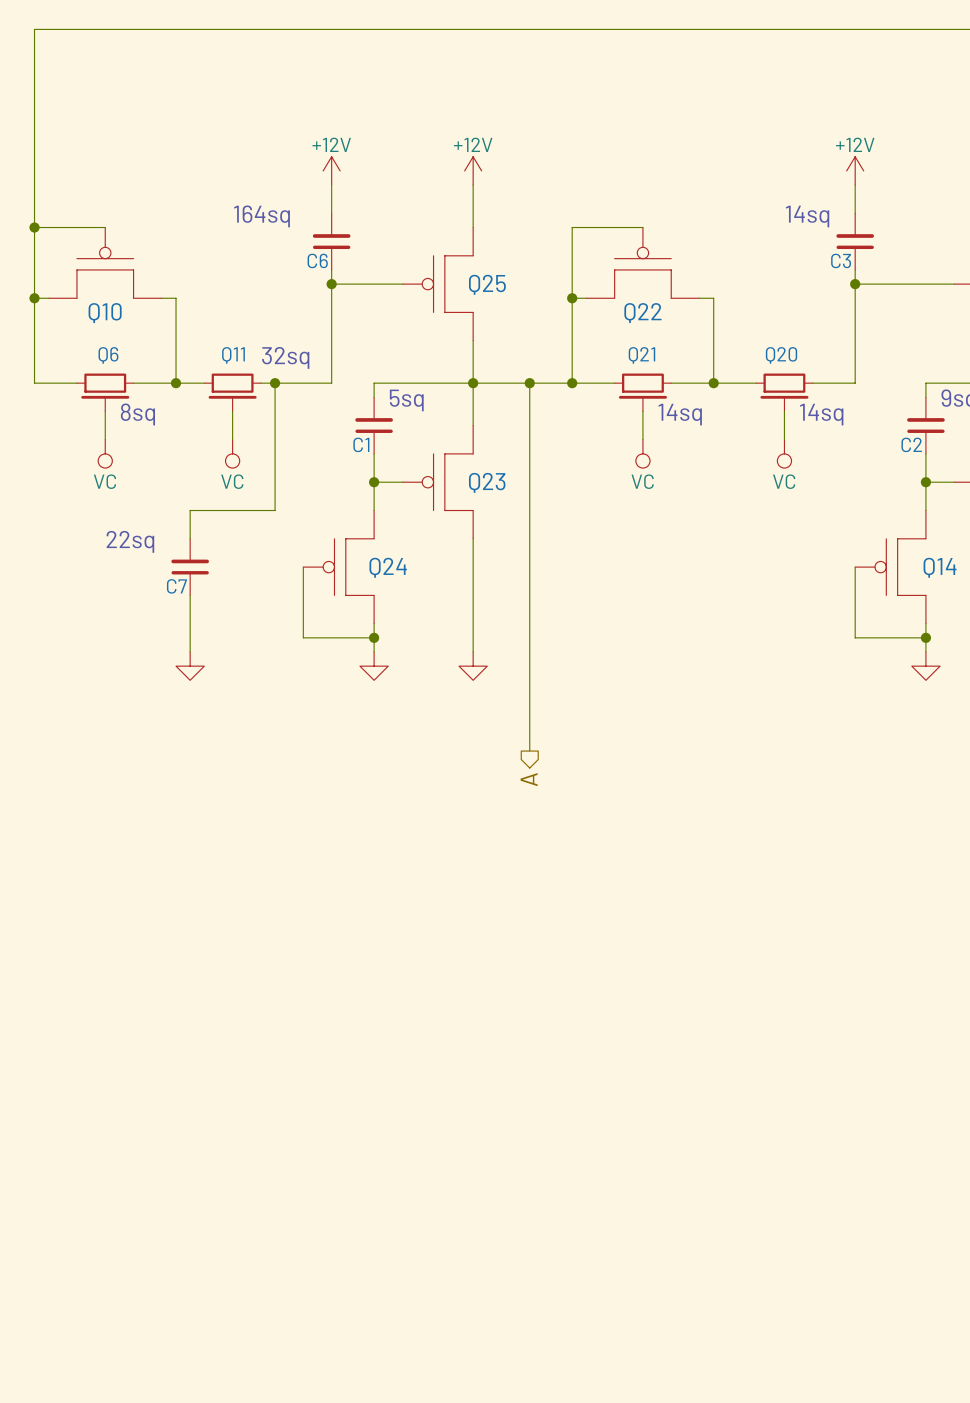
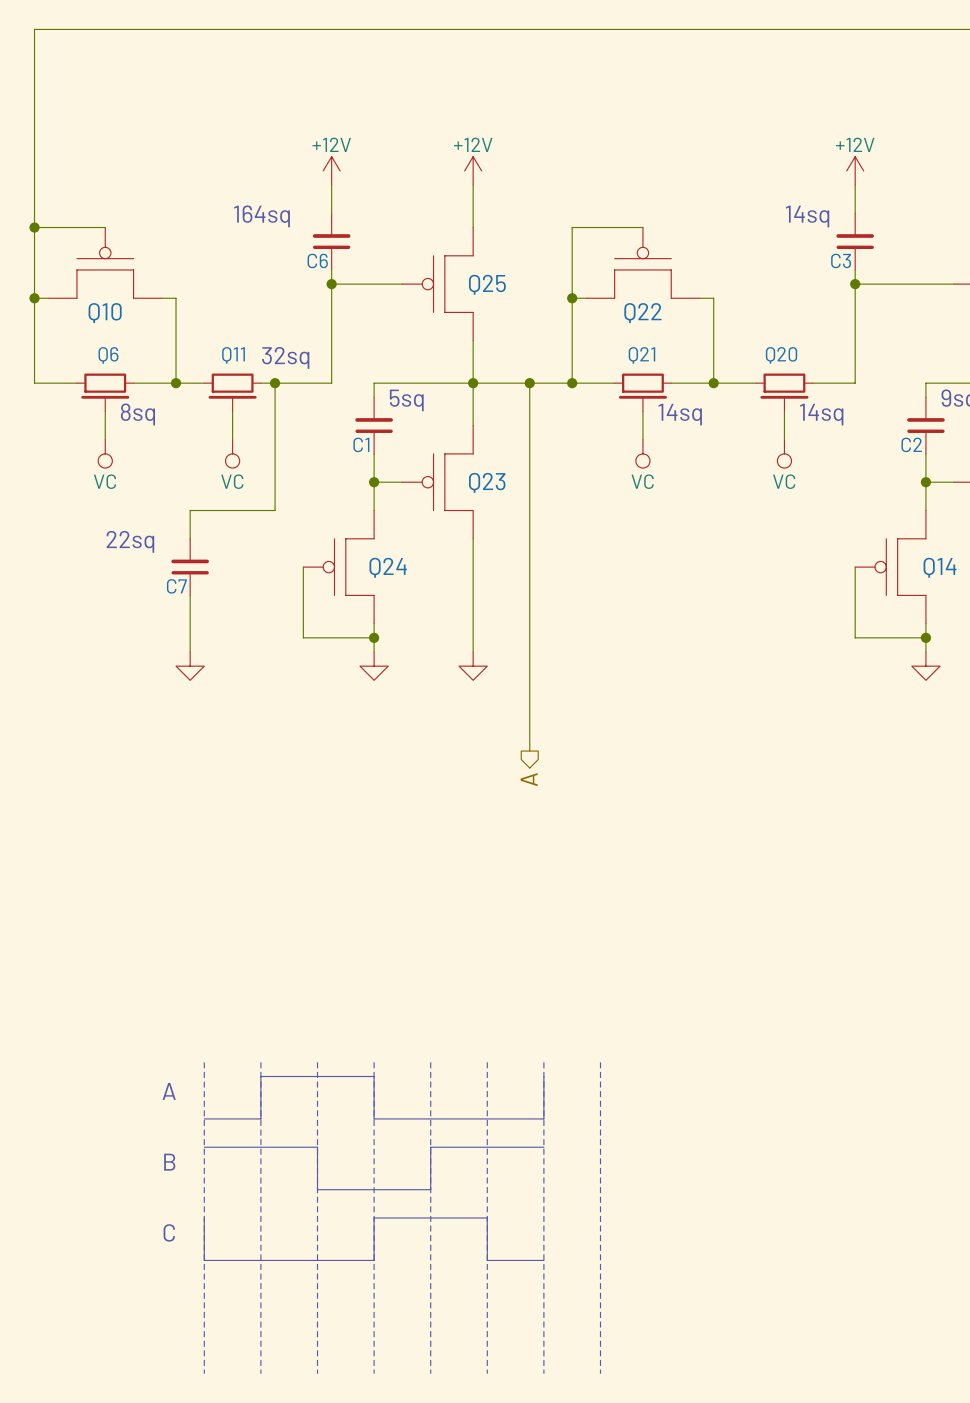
line: none -> (204, 1062) (204, 1373)
line: none -> (260, 1062) (260, 1373)
line: none -> (317, 1062) (317, 1373)
line: none -> (374, 1062) (374, 1373)
line: none -> (430, 1062) (430, 1373)
line: none -> (487, 1062) (487, 1373)
line: none -> (543, 1062) (543, 1373)
line: none -> (600, 1062) (600, 1373)
bus: none -> (543, 1076) (543, 1118) (374, 1118) (374, 1076) (260, 1076) (260, 1118) (204, 1118)
text: none -> A (169, 1091)
bus: none -> (204, 1147) (317, 1147) (317, 1189) (430, 1189) (430, 1147) (543, 1147)
text: none -> B (169, 1162)
bus: none -> (204, 1217) (204, 1260) (374, 1260) (374, 1217) (487, 1217) (487, 1260) (543, 1260)
text: none -> C (169, 1232)

